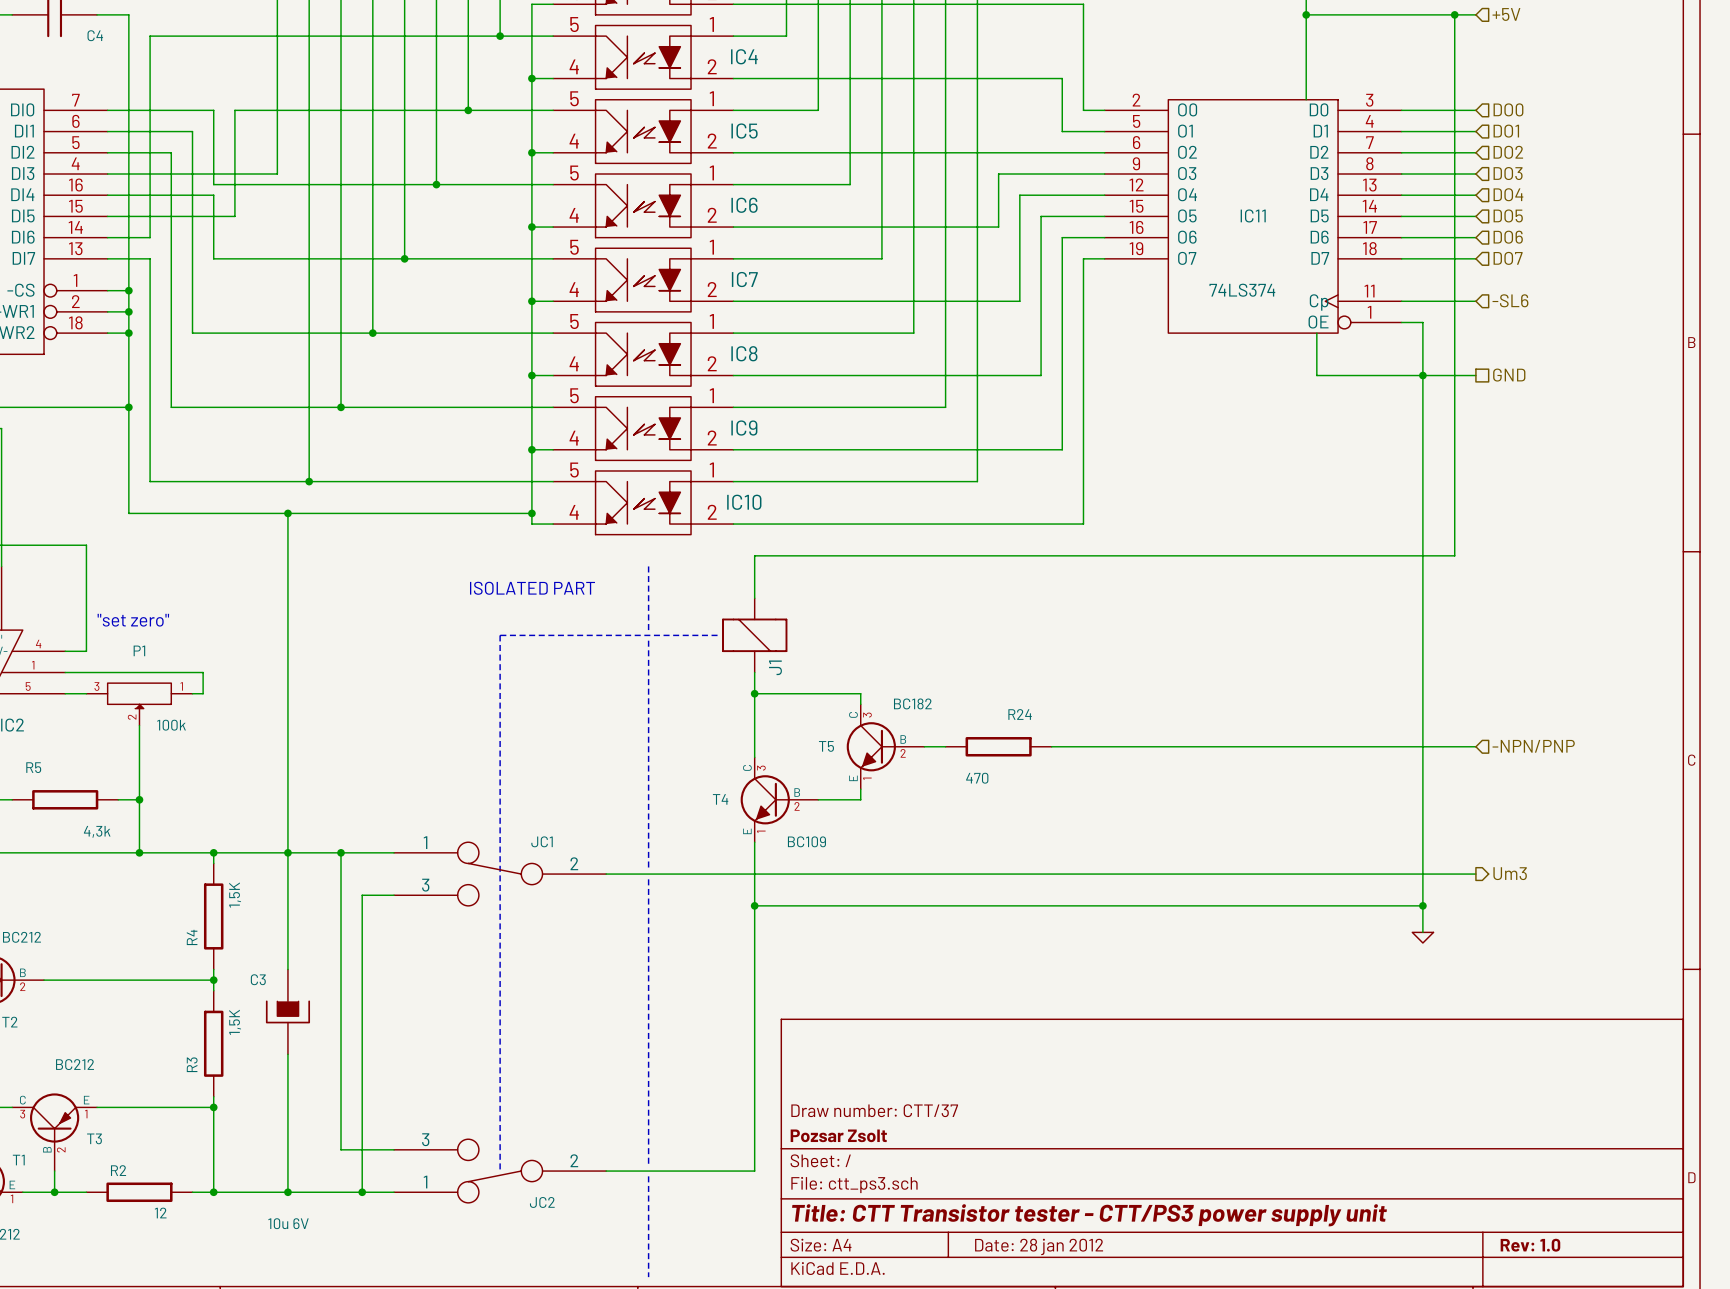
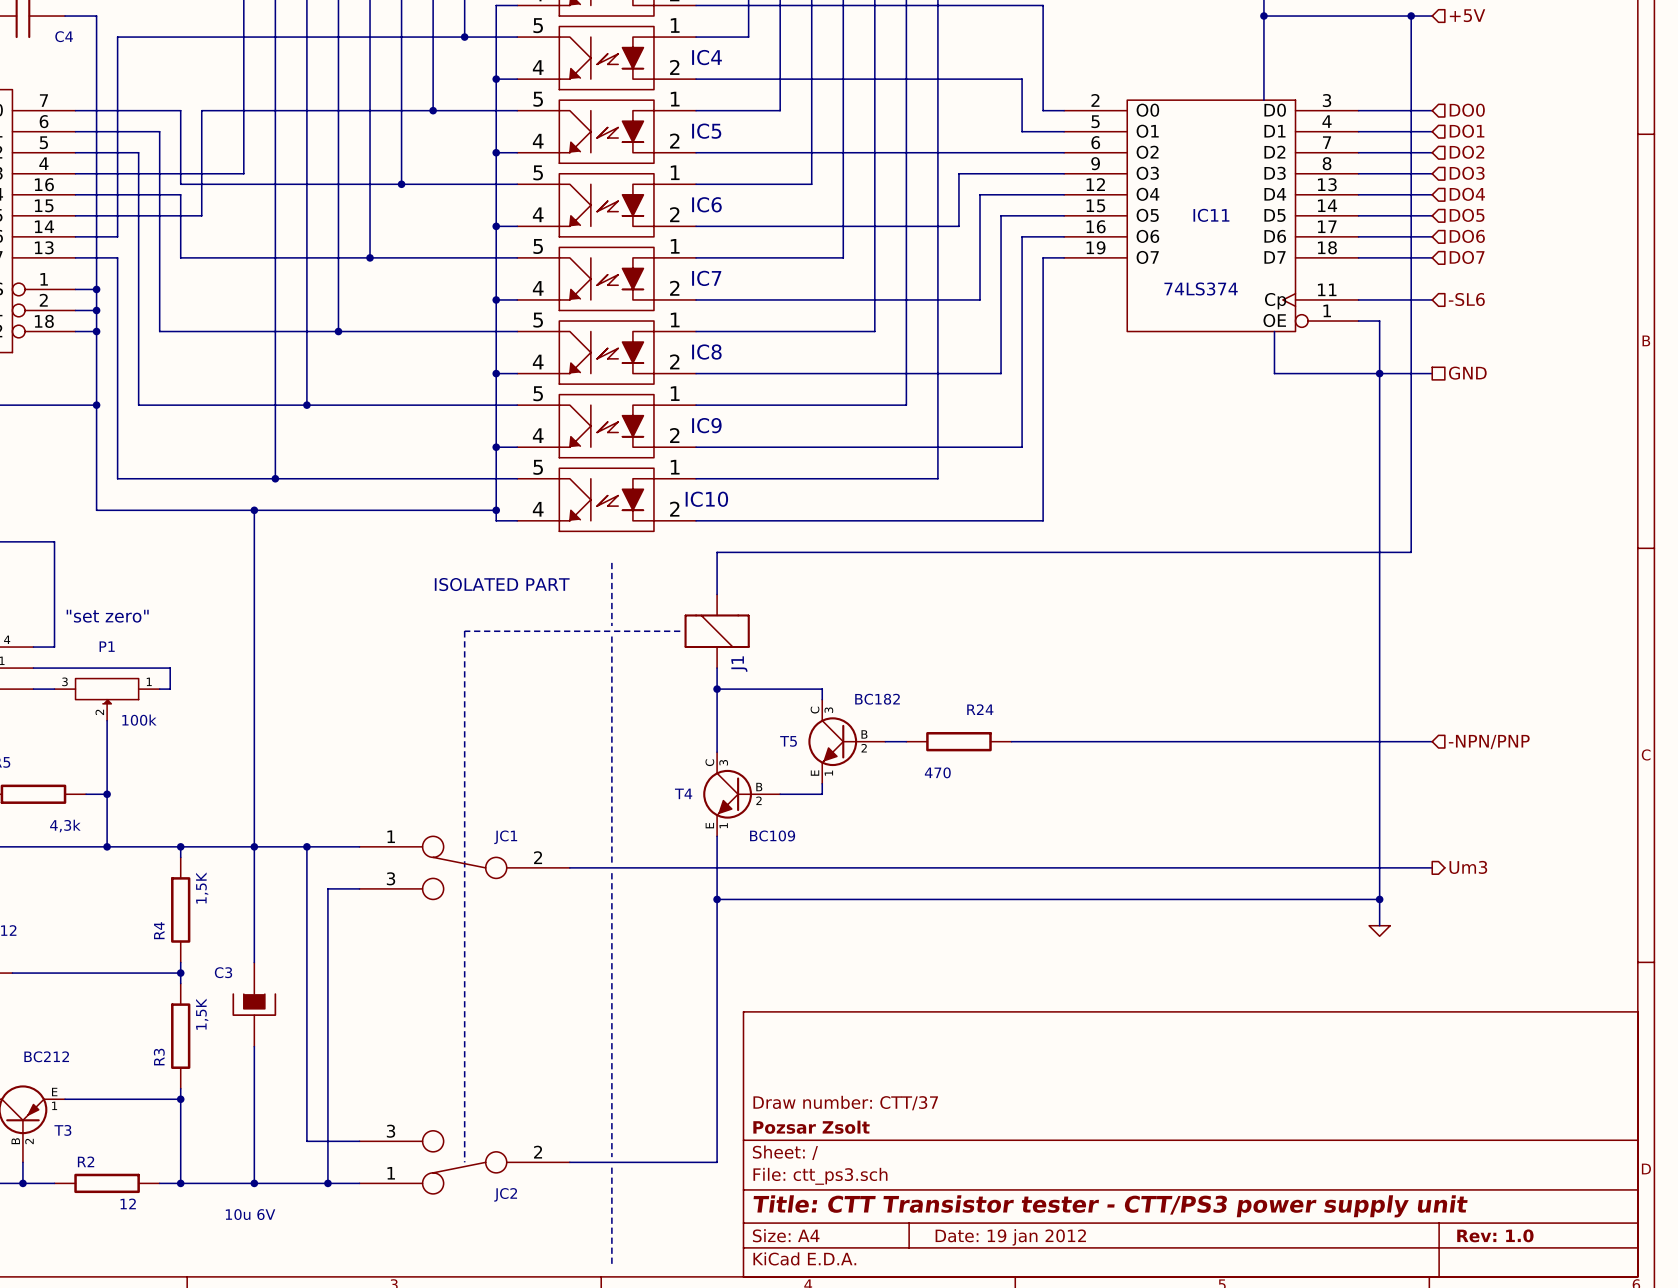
title block: Date: 28 jan 2012 (1039, 1246) -> Date: 19 jan 2012 (1010, 1237)

